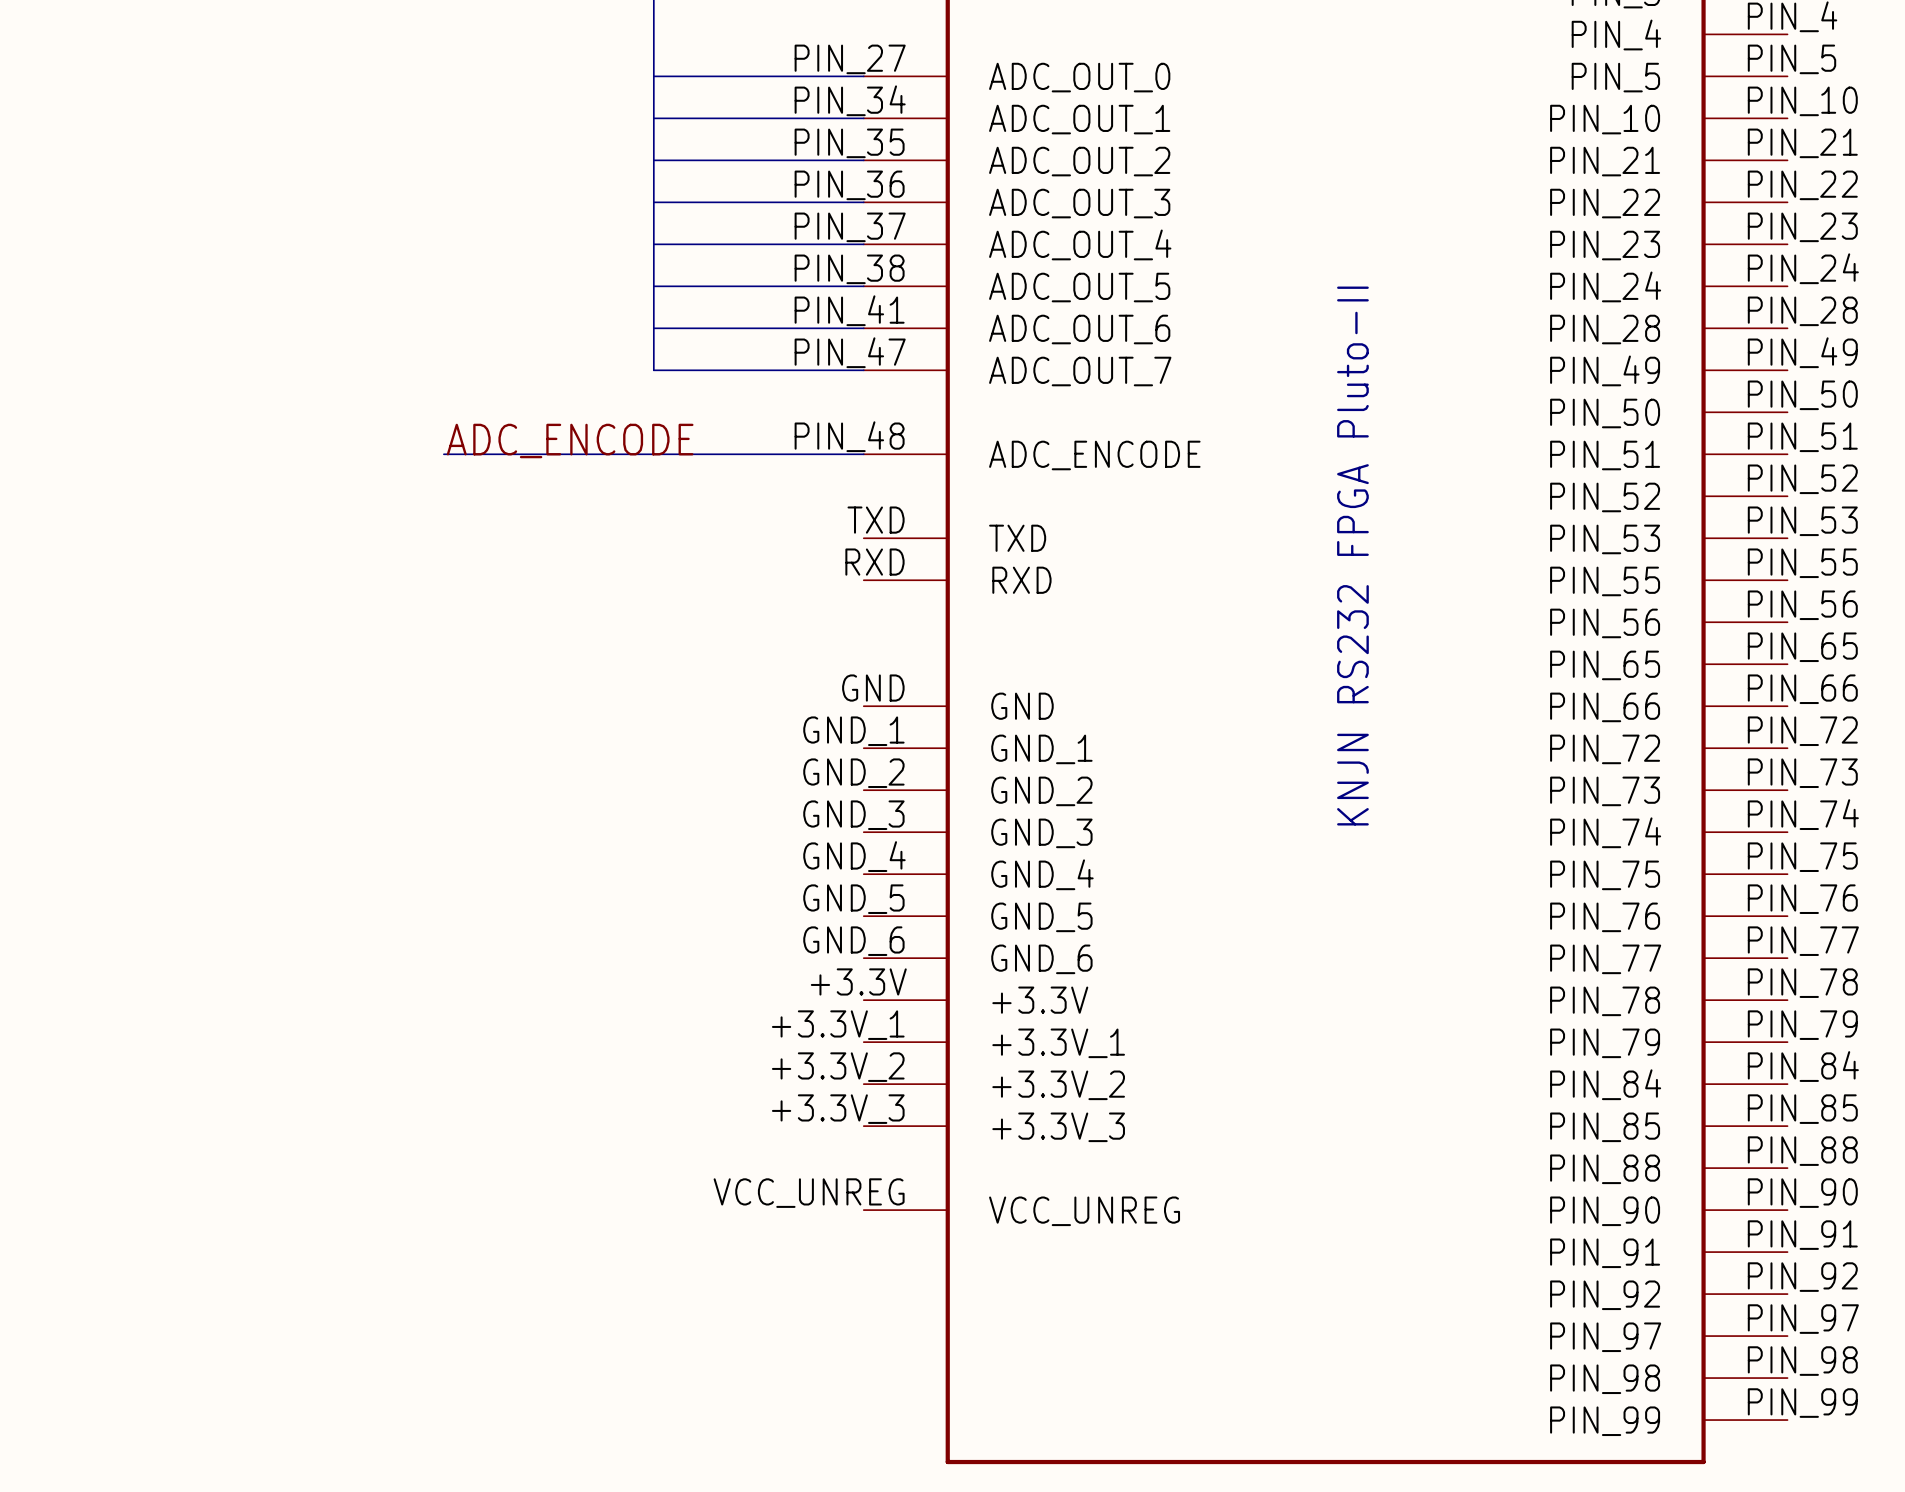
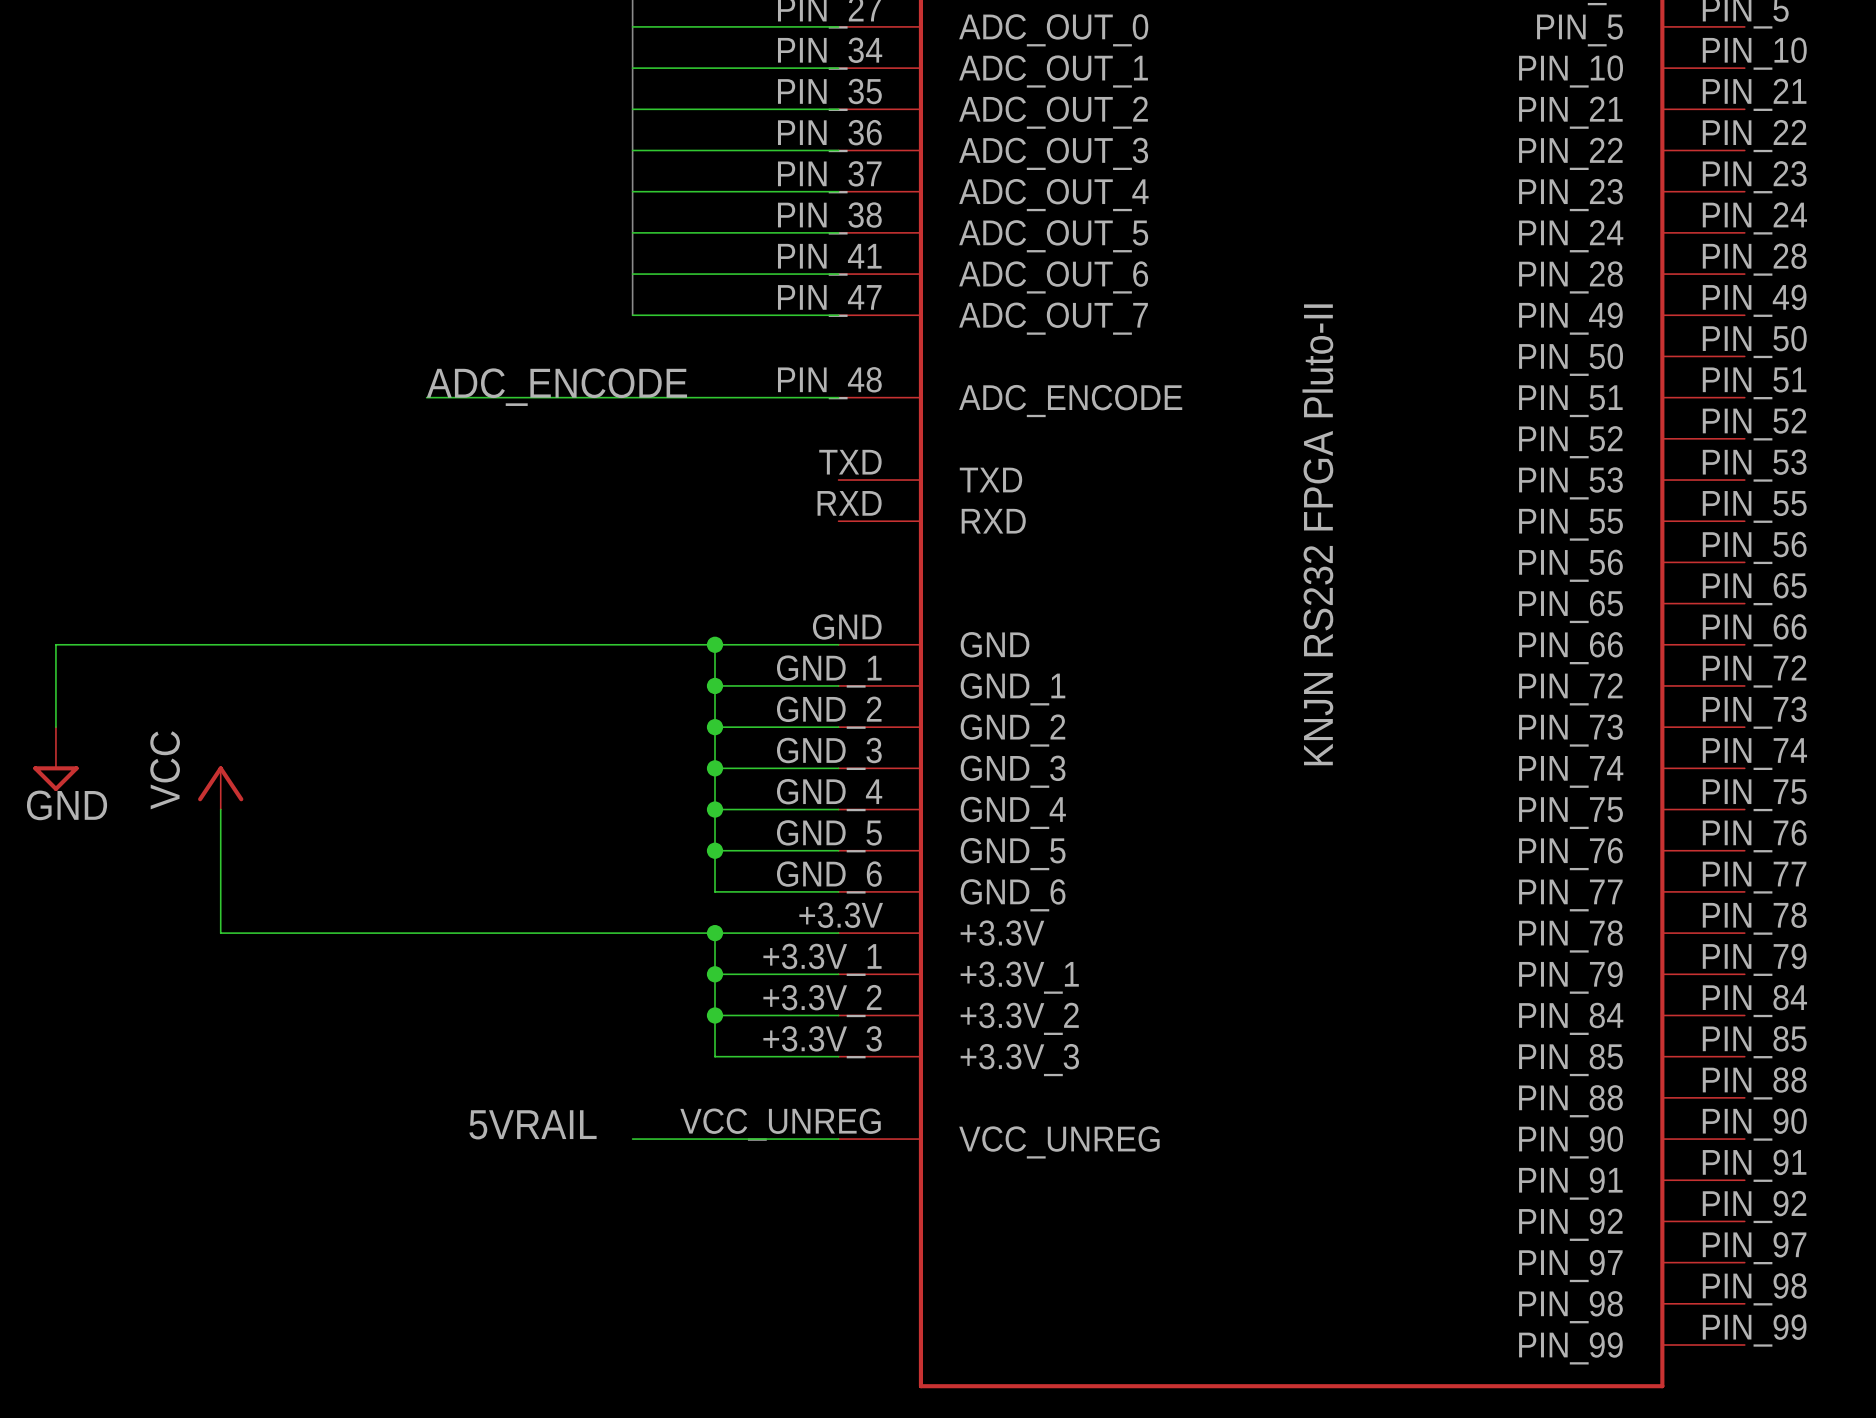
wire: none -> (714, 644) (714, 891) (838, 891)
junction: none -> (714, 644)
wire: none -> (838, 644) (55, 644) (55, 727)
wire: none -> (714, 685) (838, 685)
junction: none -> (714, 685)
wire: none -> (714, 727) (838, 727)
junction: none -> (714, 727)
power symbol: none -> GND (55, 759)
wire: none -> (714, 768) (838, 768)
junction: none -> (714, 768)
power symbol: none -> VCC (220, 787)
wire: none -> (220, 809) (220, 933) (838, 933)
wire: none -> (714, 809) (838, 809)
junction: none -> (714, 809)
wire: none -> (714, 850) (838, 850)
junction: none -> (714, 850)
wire: none -> (714, 933) (714, 1056) (838, 1056)
junction: none -> (714, 933)
wire: none -> (714, 974) (838, 974)
junction: none -> (714, 974)
wire: none -> (714, 1015) (838, 1015)
junction: none -> (714, 1015)
label: none -> 5VRAIL (532, 1124)
wire: none -> (632, 1139) (838, 1139)

